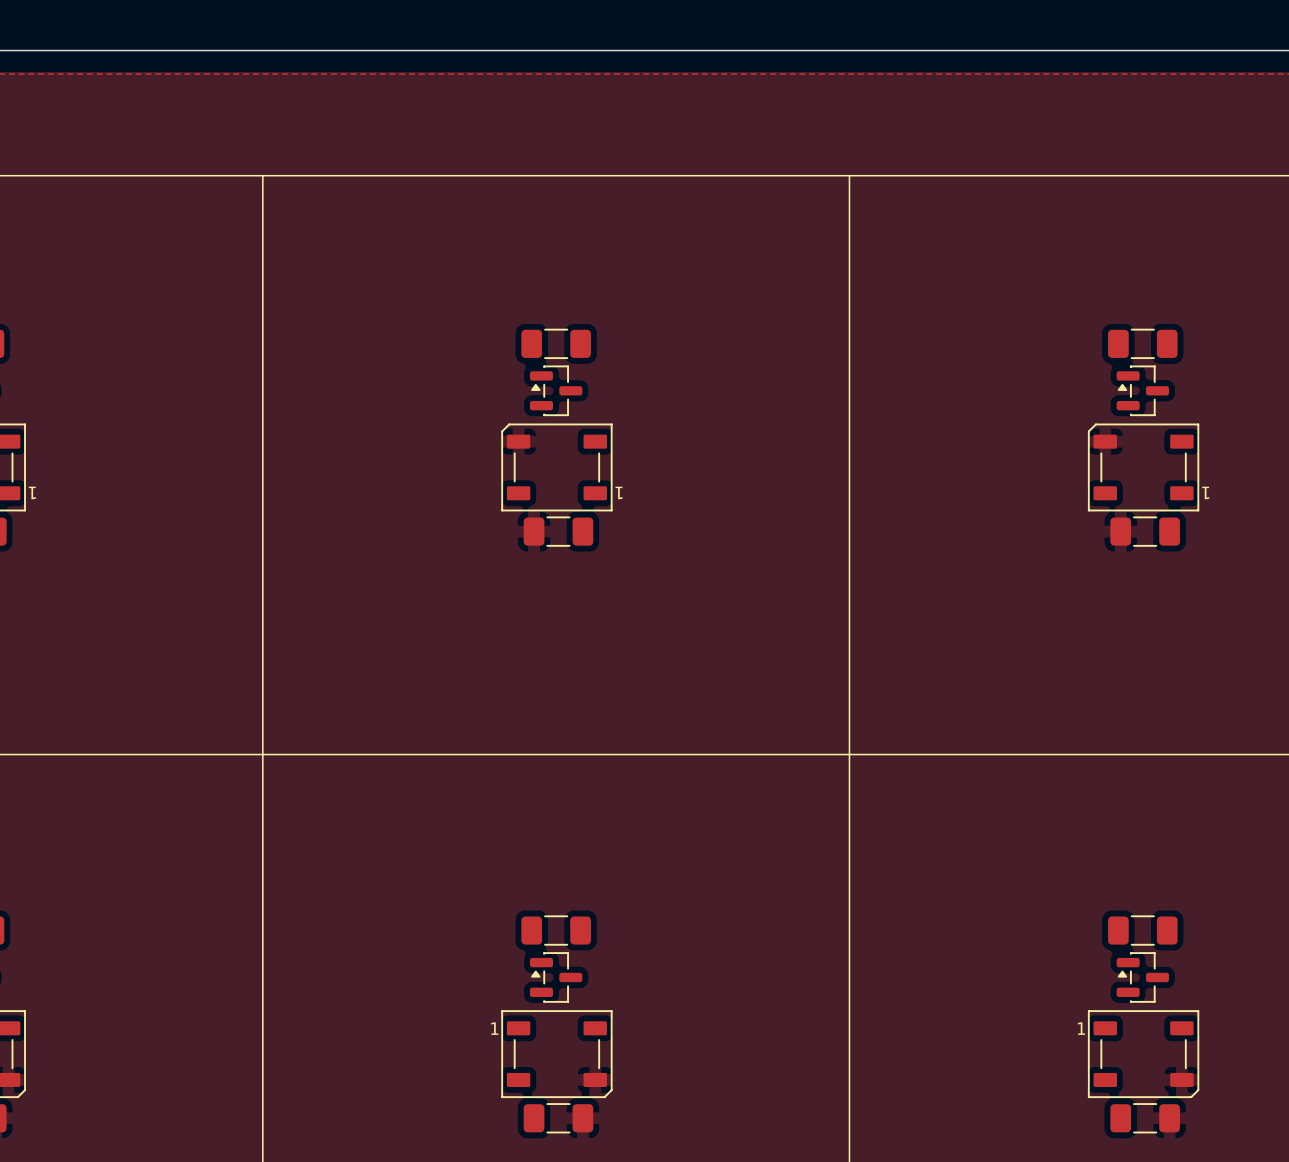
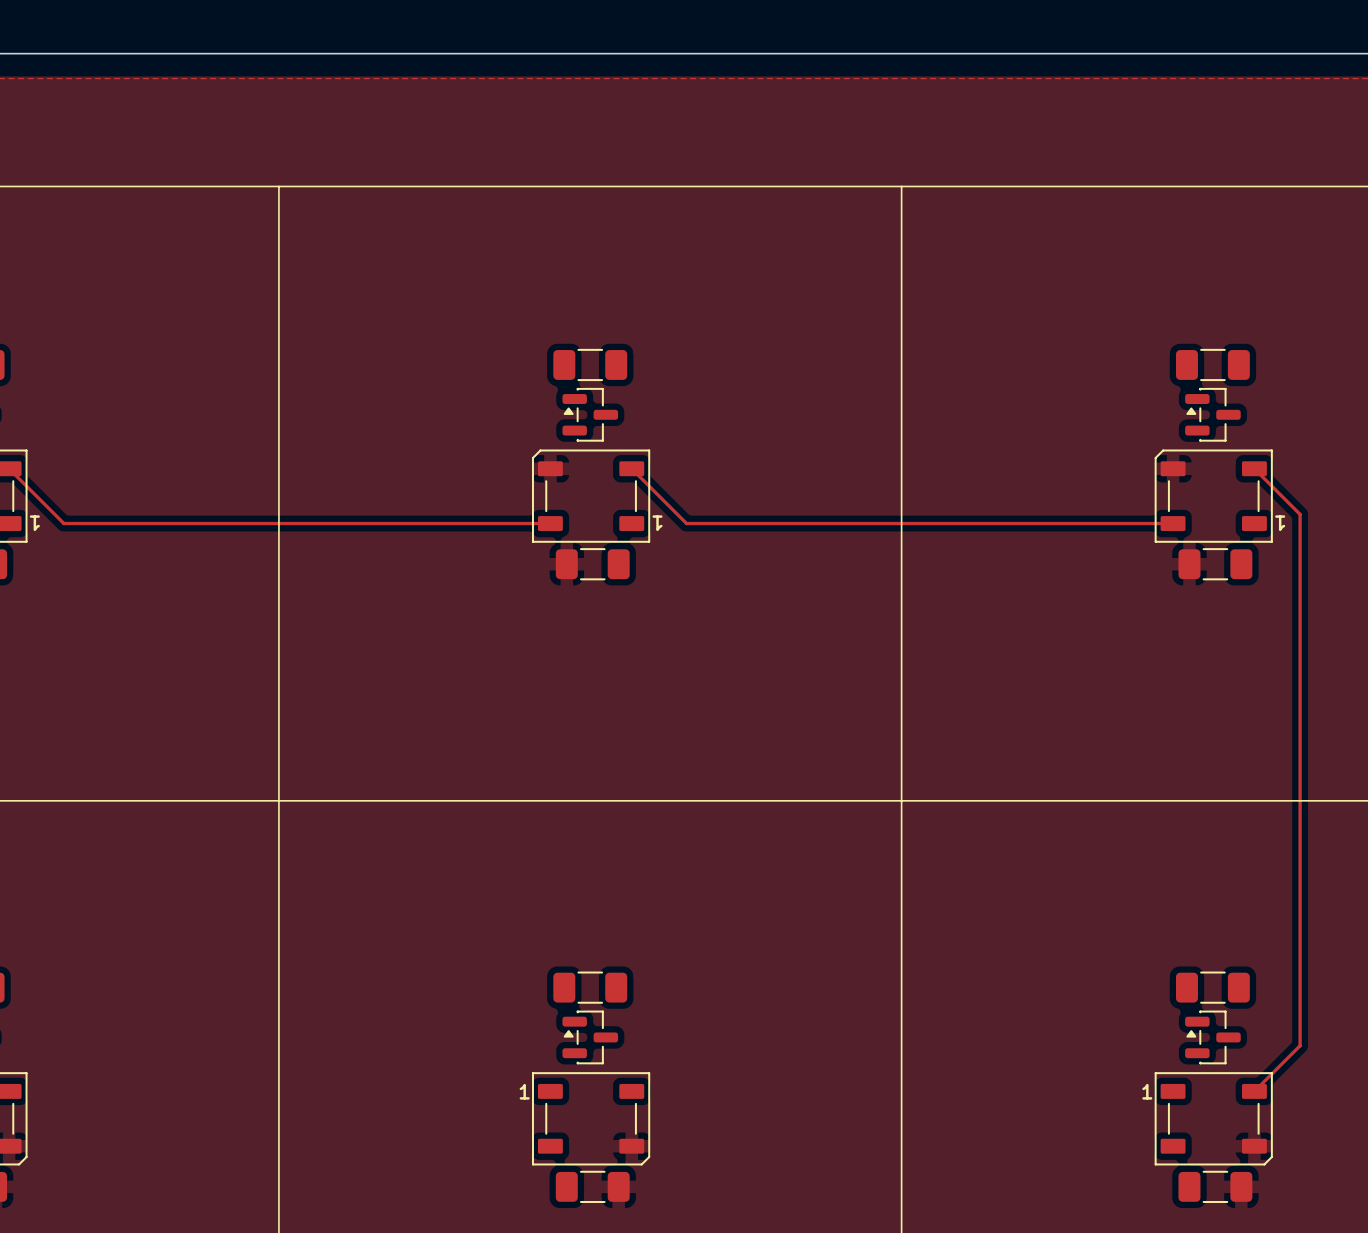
track: none -> (9, 468) (63, 523) (550, 523)
track: none -> (631, 468) (686, 523) (1173, 523)
track: none -> (1254, 468) (1300, 514) (1300, 1045) (1254, 1091)

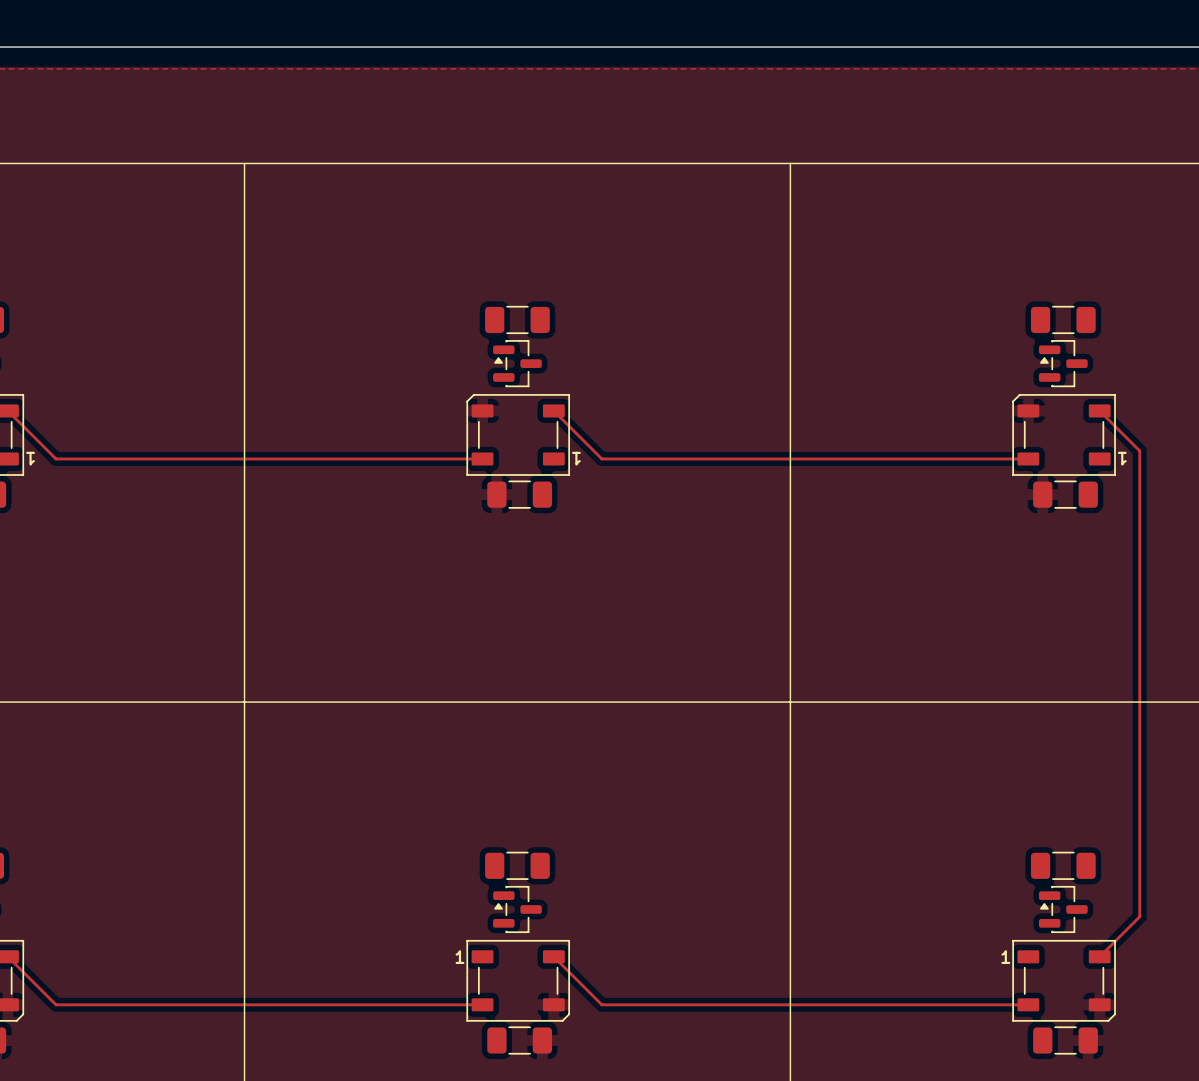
track: none -> (7, 956) (56, 1004) (482, 1004)
track: none -> (553, 956) (601, 1004) (1028, 1004)

